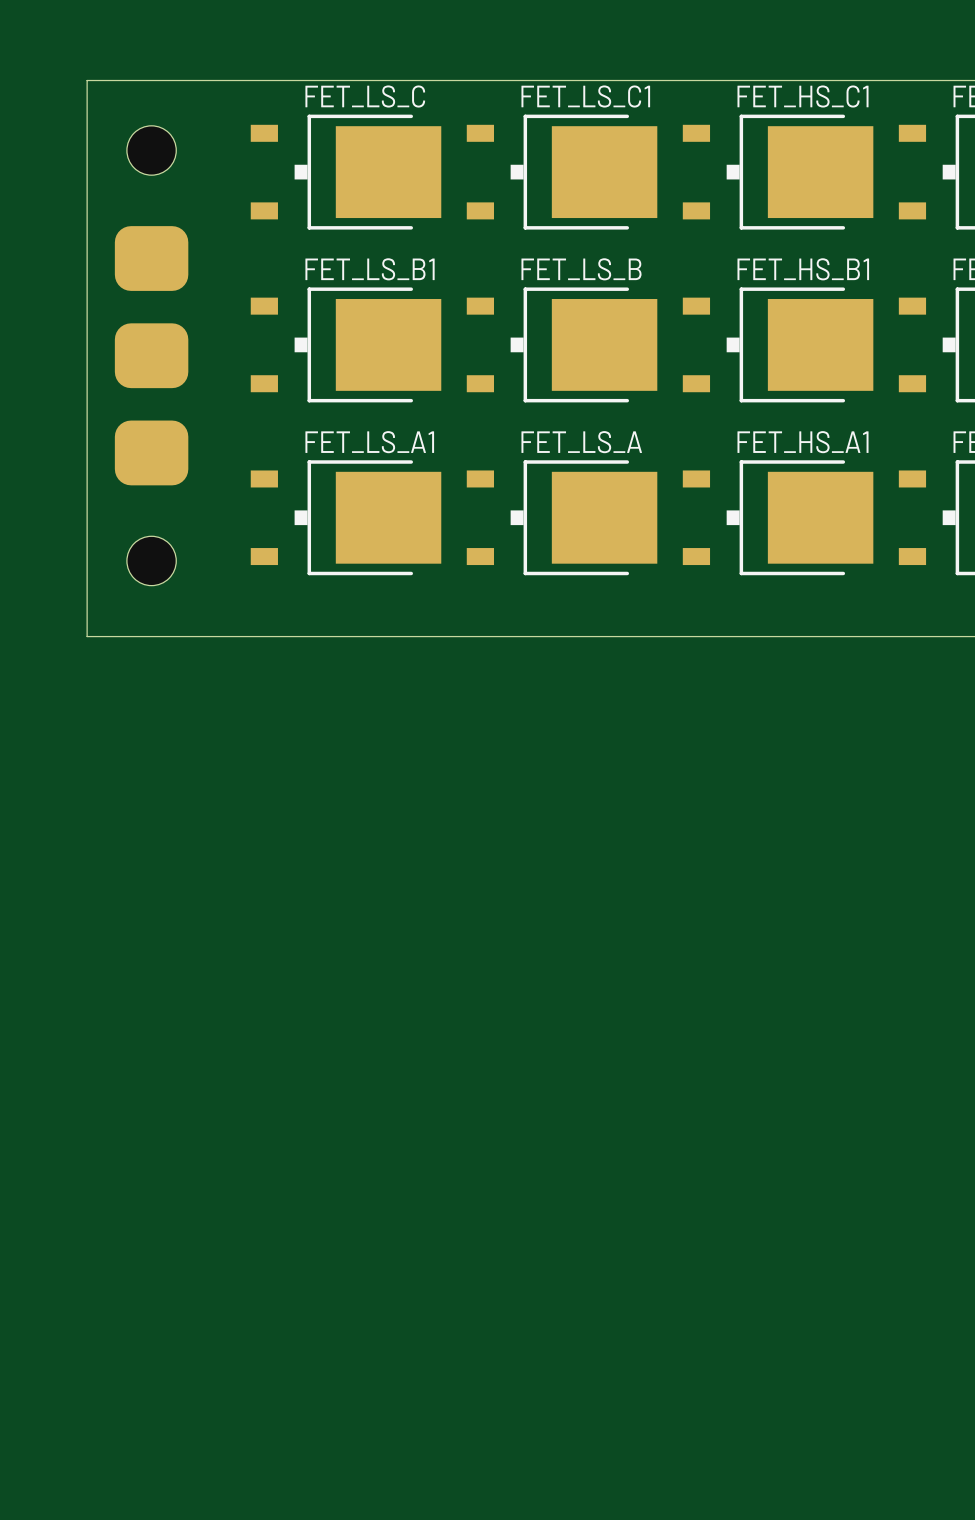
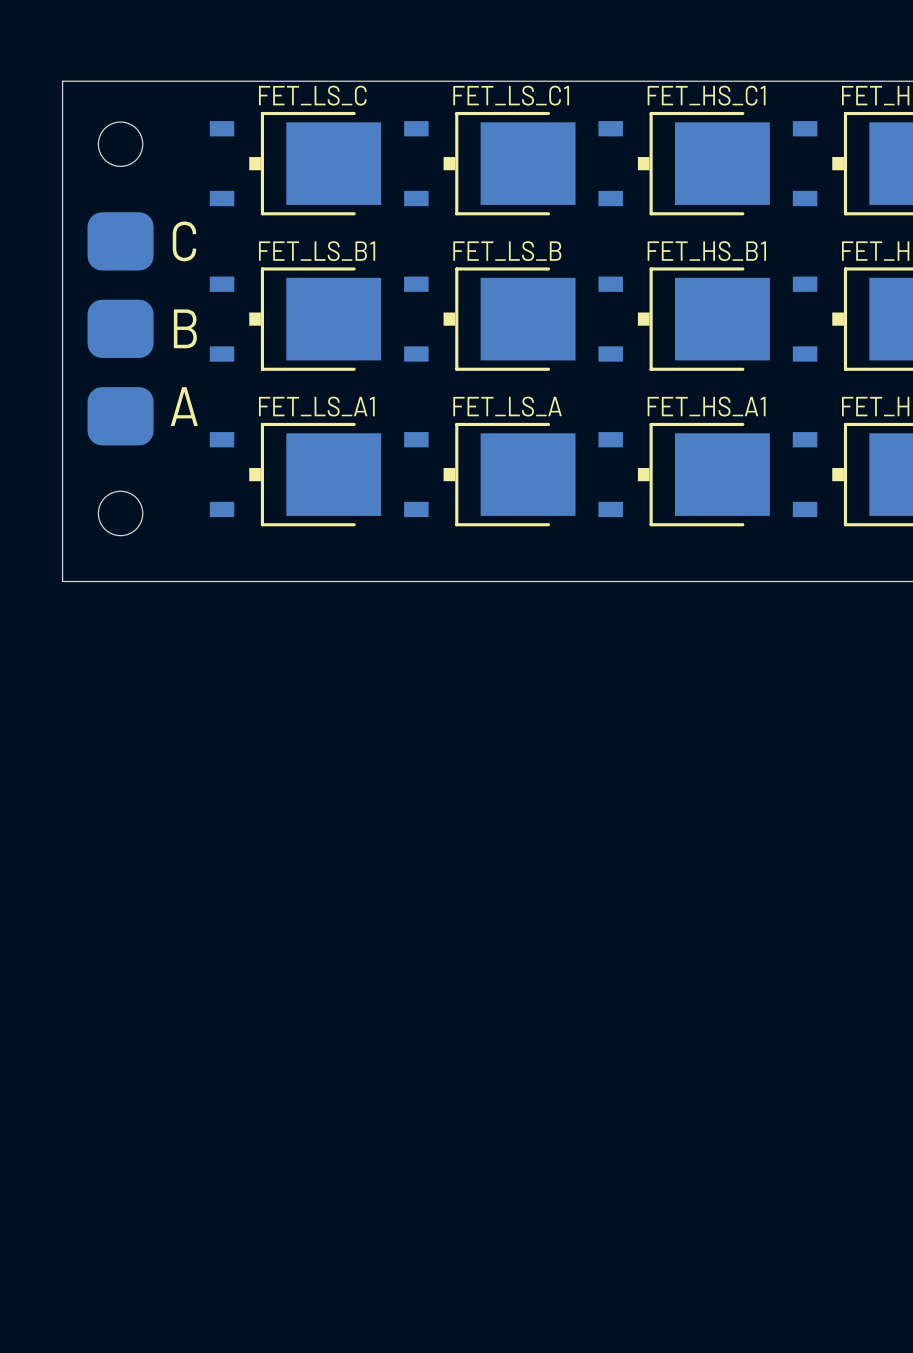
text: none -> C (184, 241)
text: none -> B (185, 328)
text: none -> A (184, 406)

